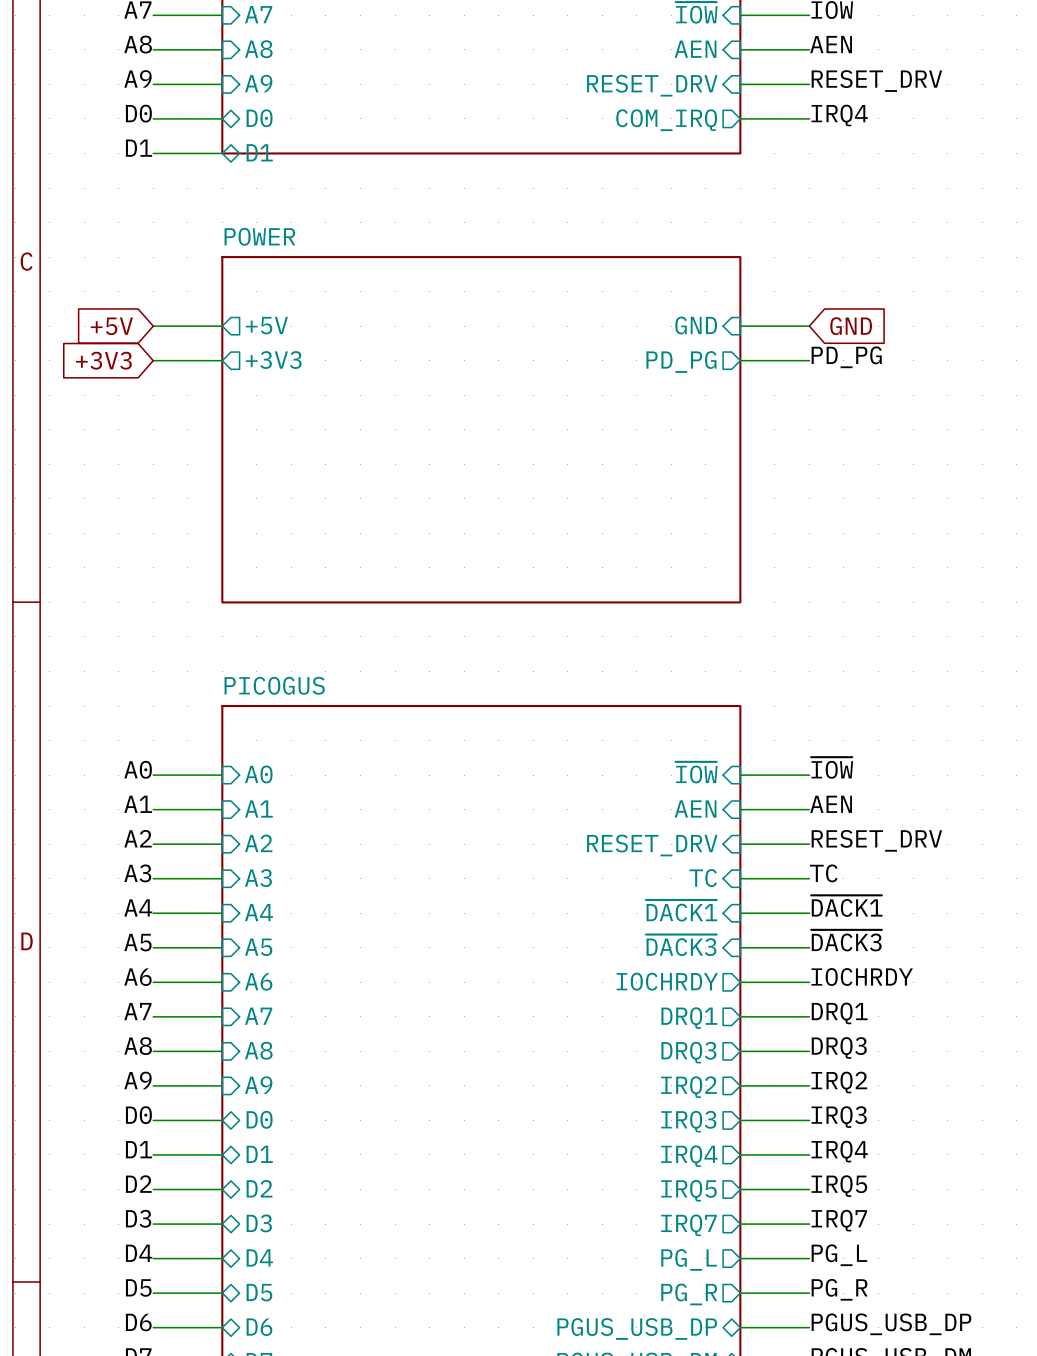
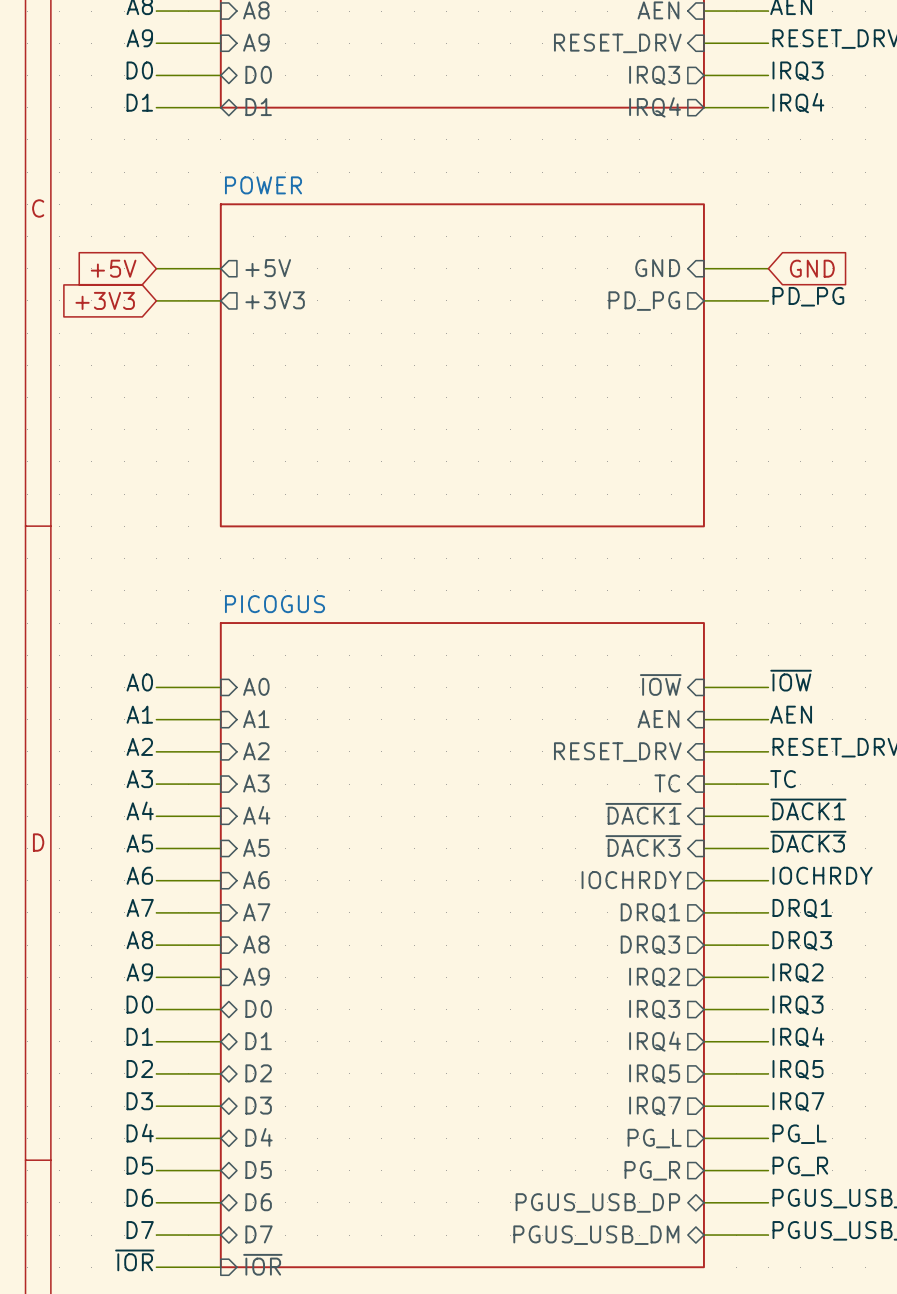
label: IRQ4 (839, 115) -> IRQ3 (798, 71)
sheet pin: COM_IRQ (666, 120) -> IRQ3 (654, 75)
label: none -> IRQ4 (798, 103)
wire: none -> (703, 107) (768, 107)
sheet pin: none -> IRQ4 (655, 107)

